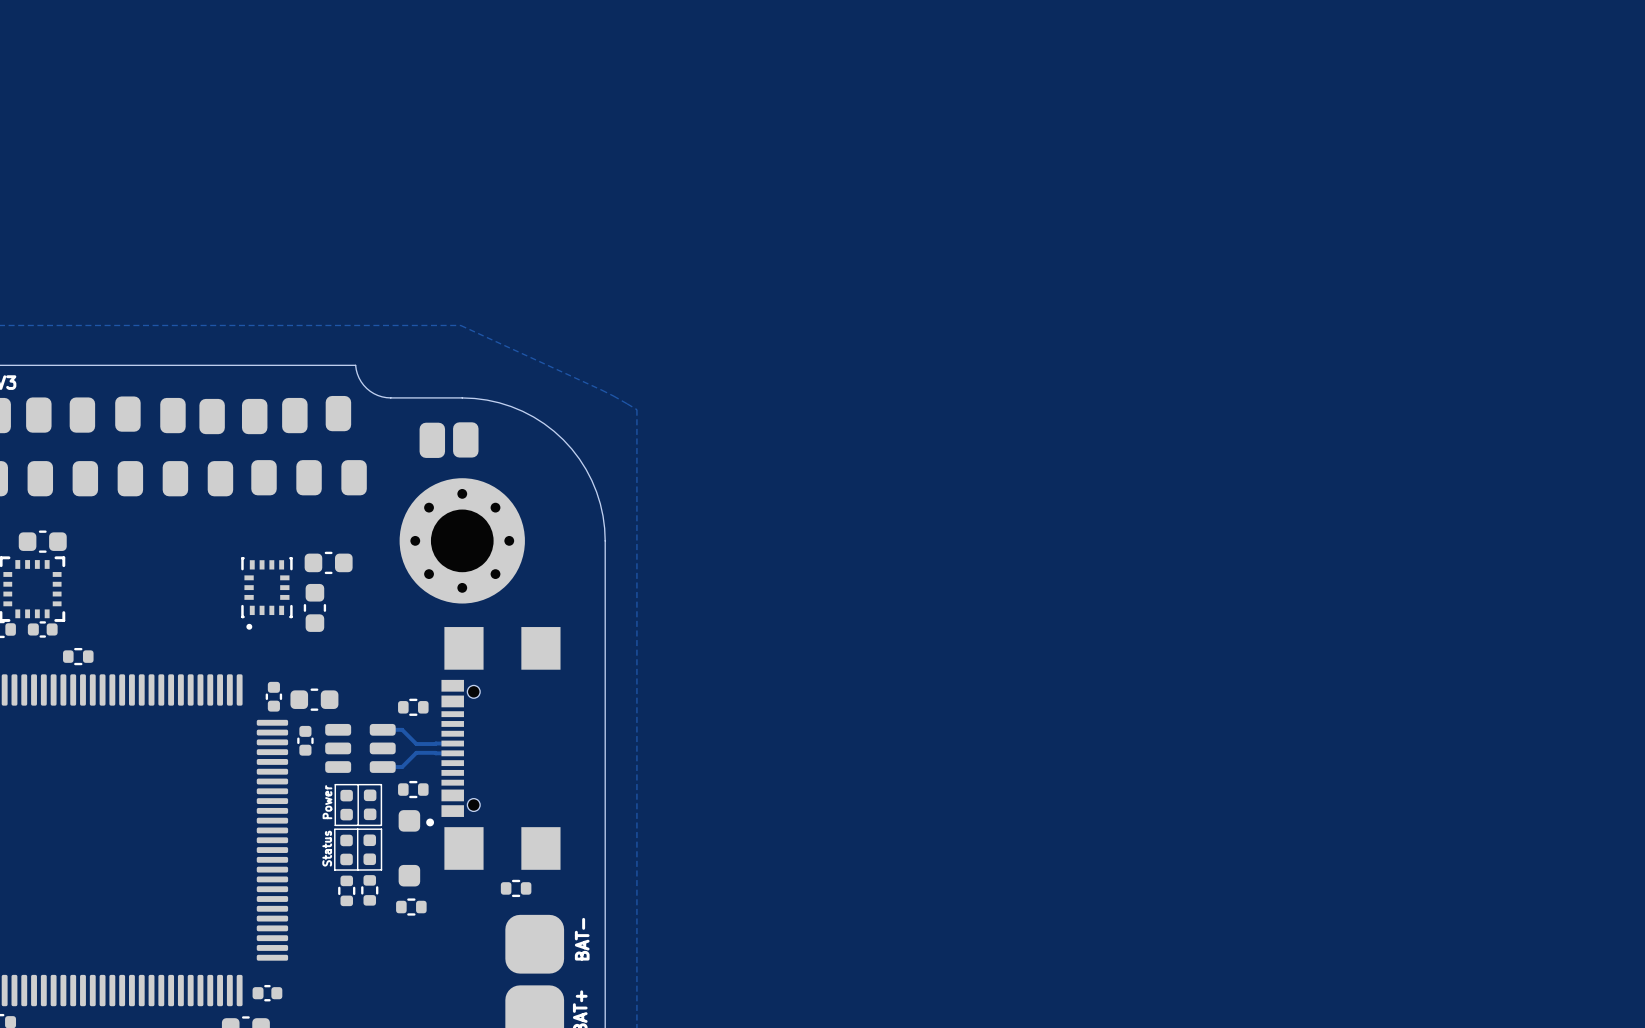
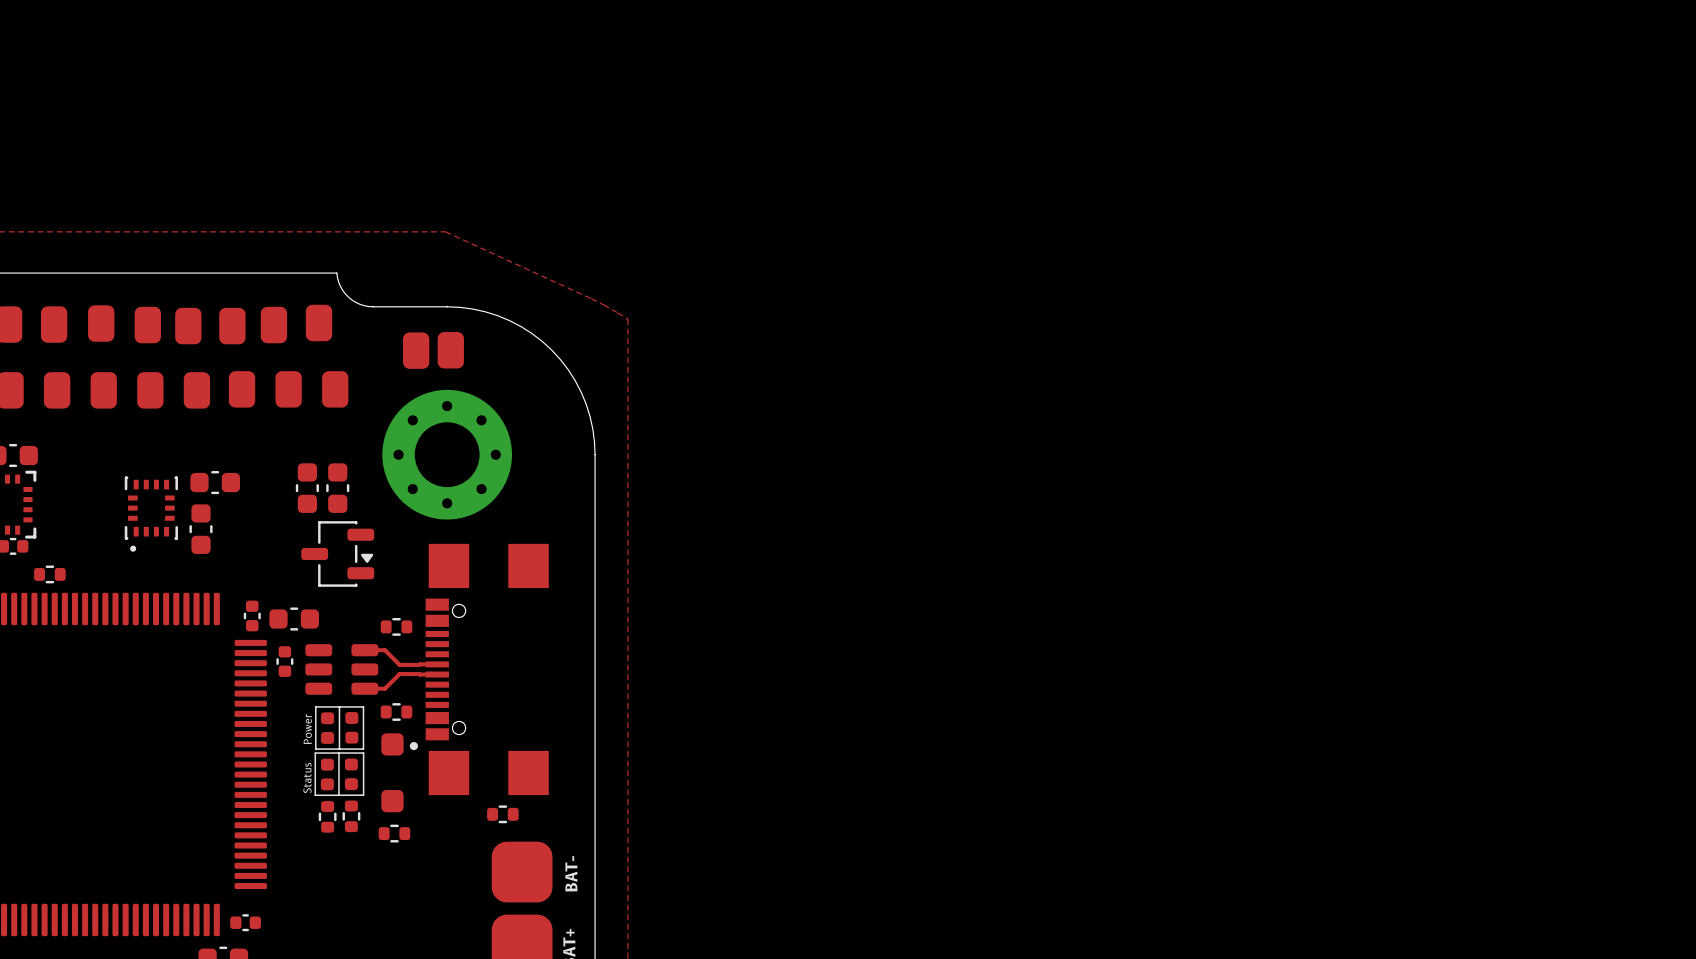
part rotation: 0° (328, 562) -> 90° clockwise (307, 488)
part: none -> (215, 482)
part: none -> (337, 488)
part position: (266, 593) -> (151, 514)
part: (314, 607) -> none
part: none -> (201, 529)
part: none -> (337, 553)

